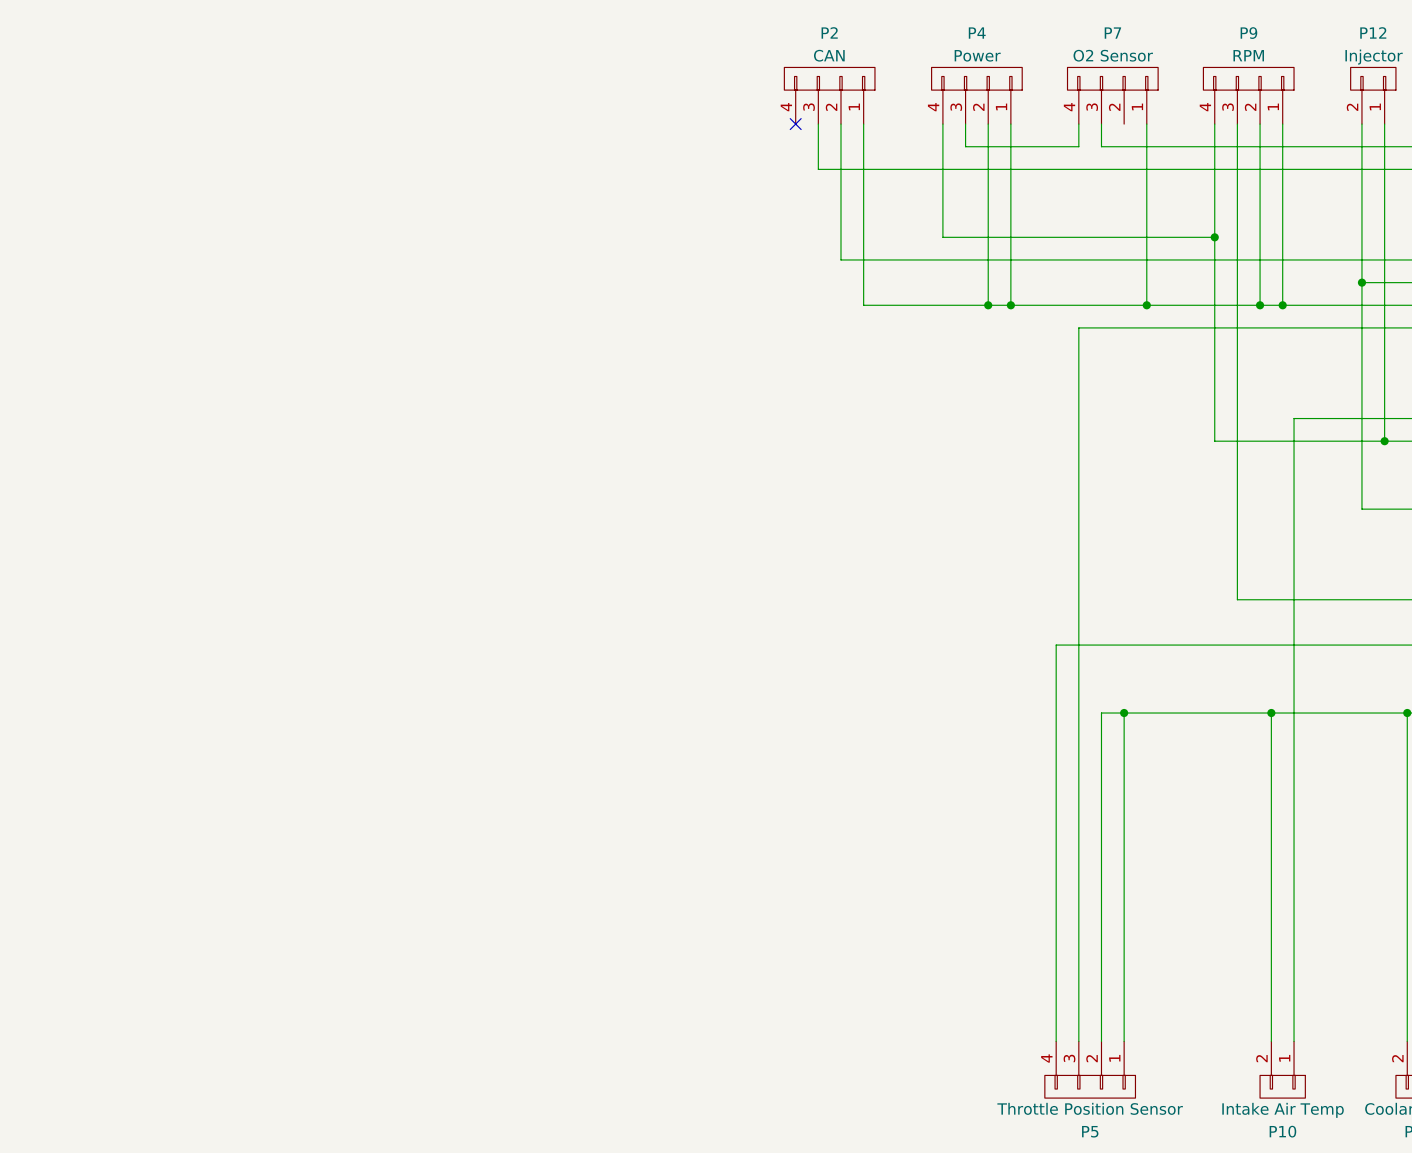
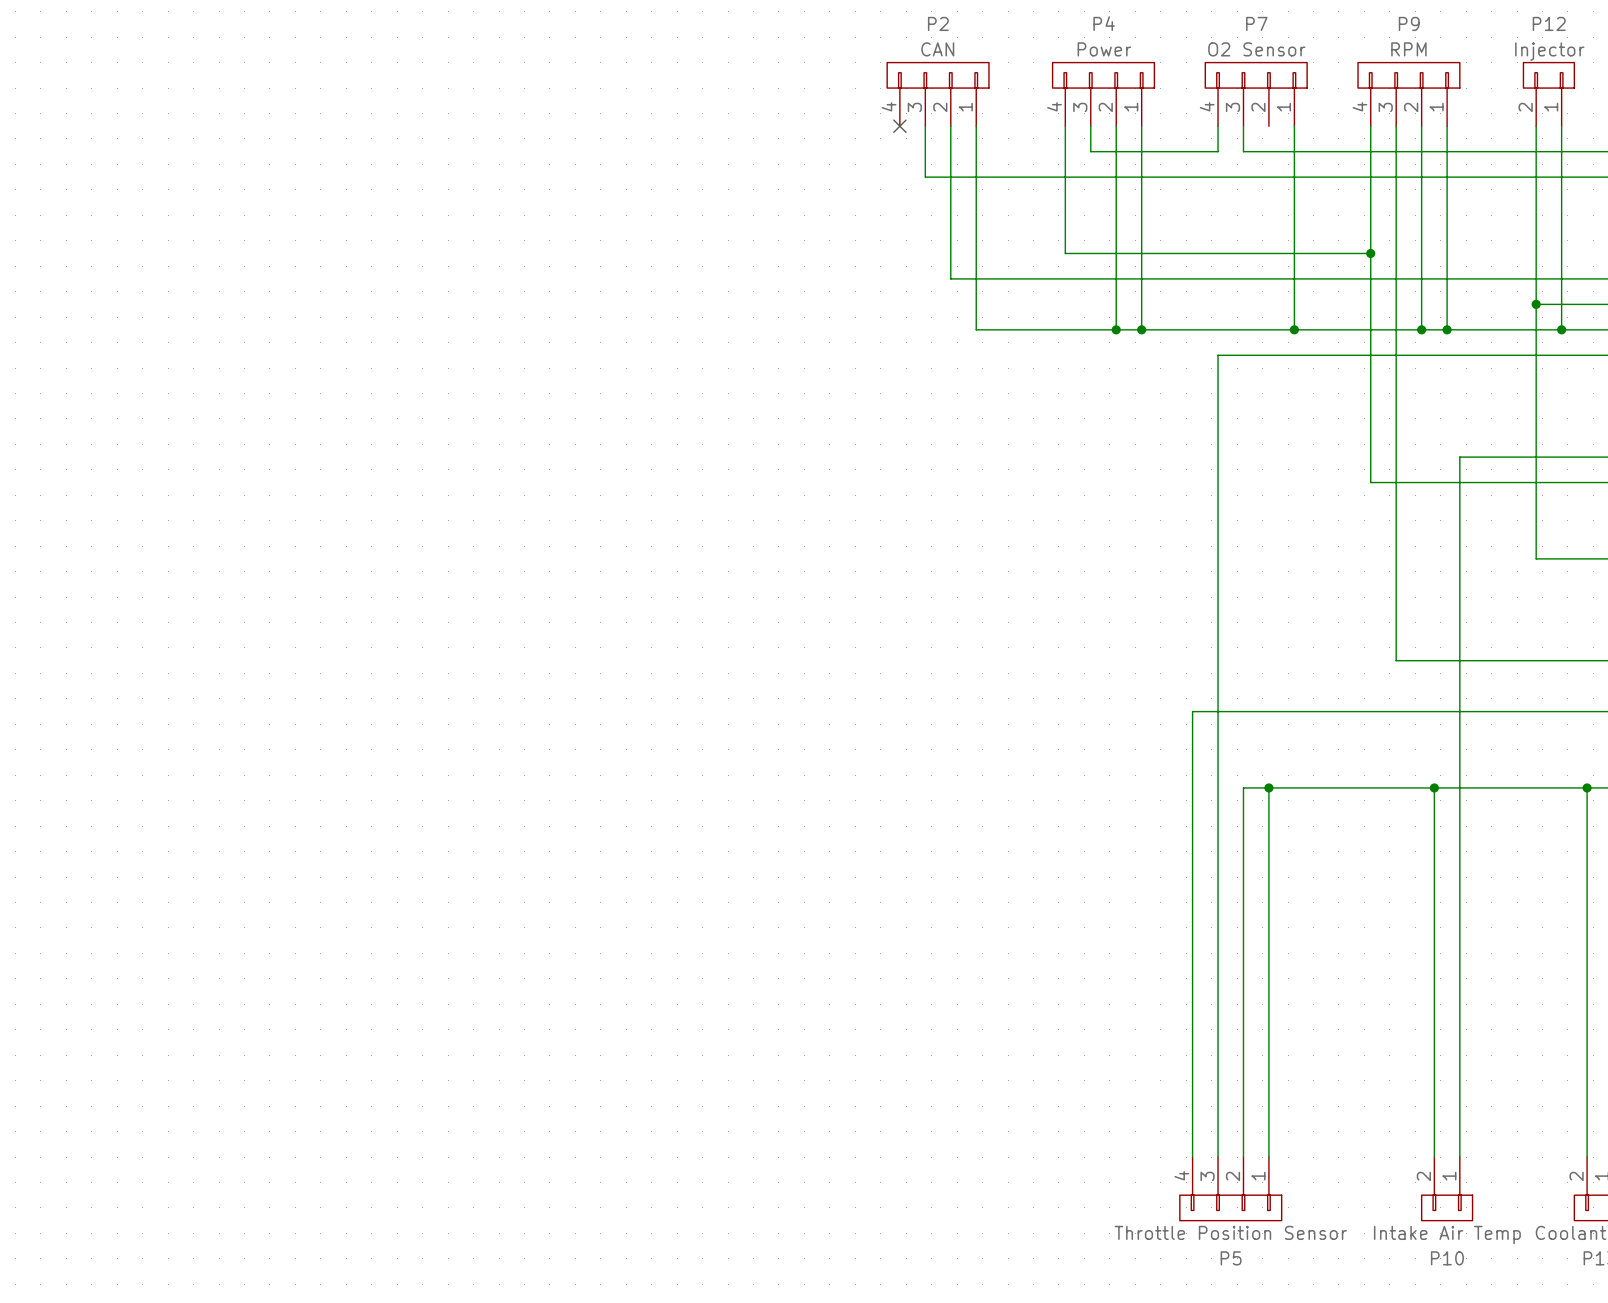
wire: (1384, 305) (1384, 441) -> none
junction: none -> (1561, 329)
junction: (1384, 441) -> none

